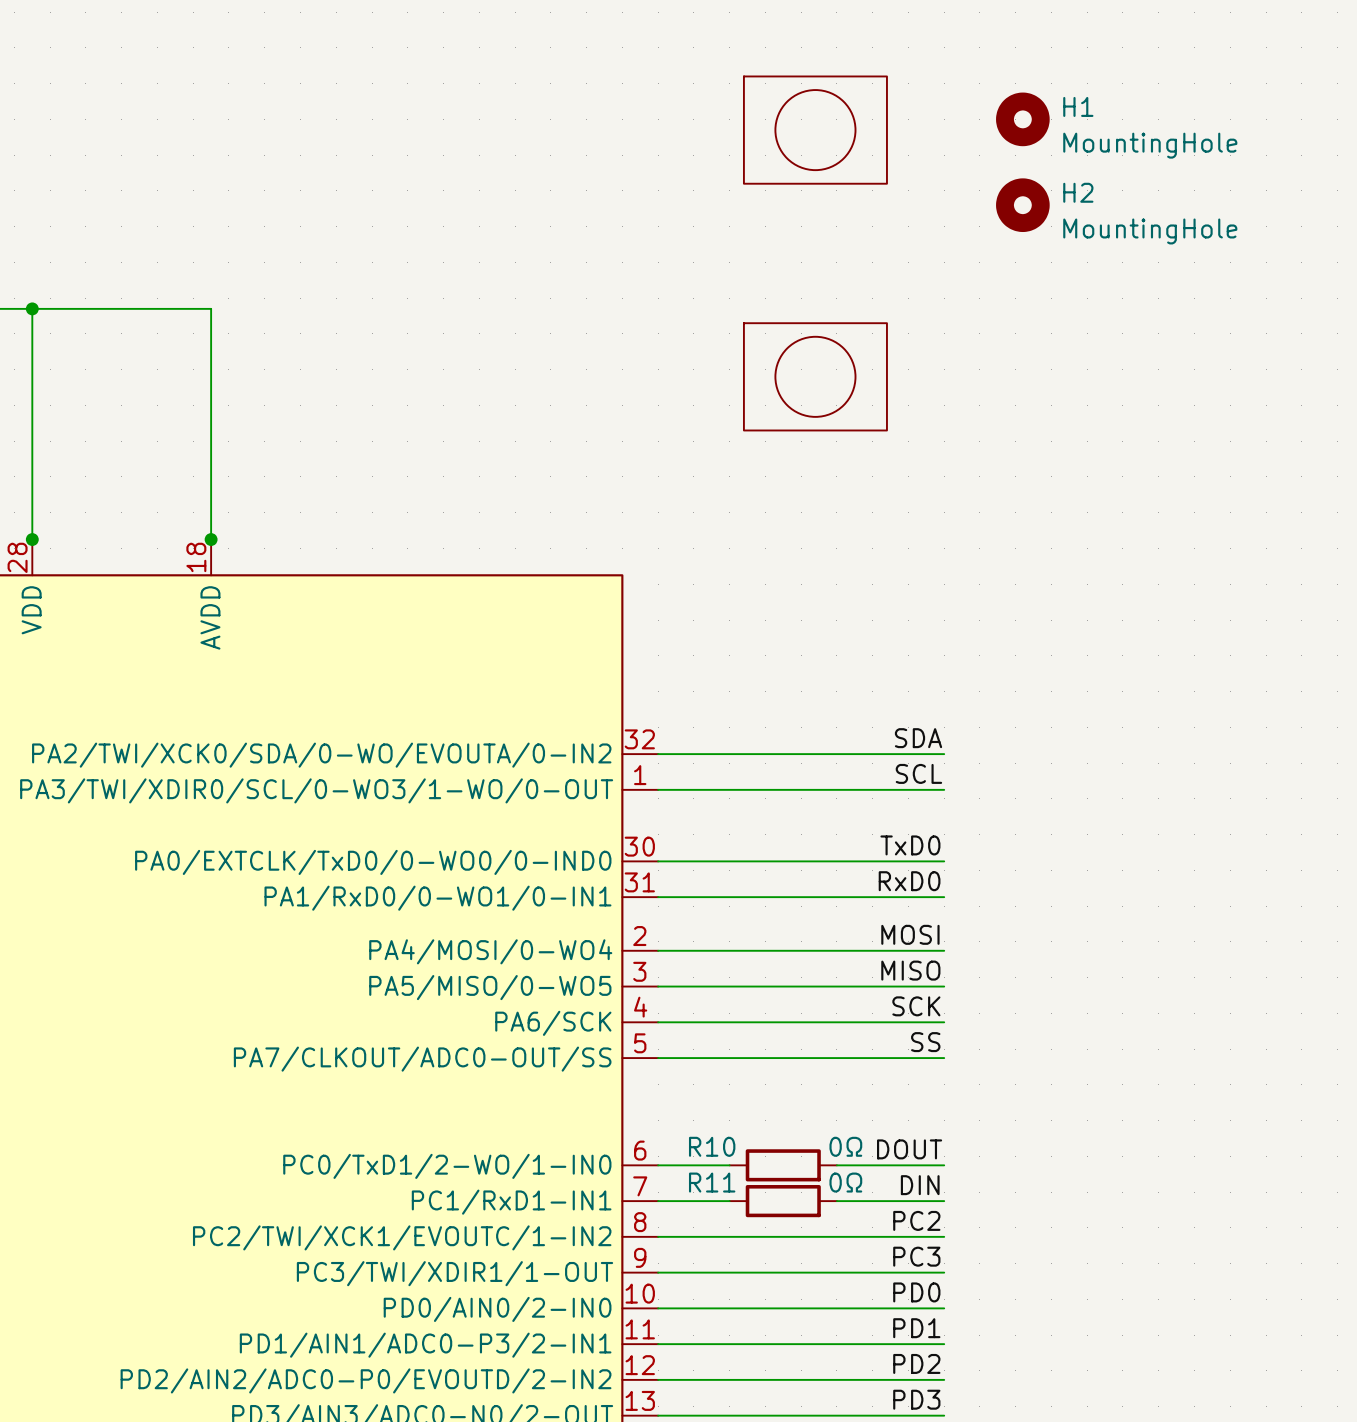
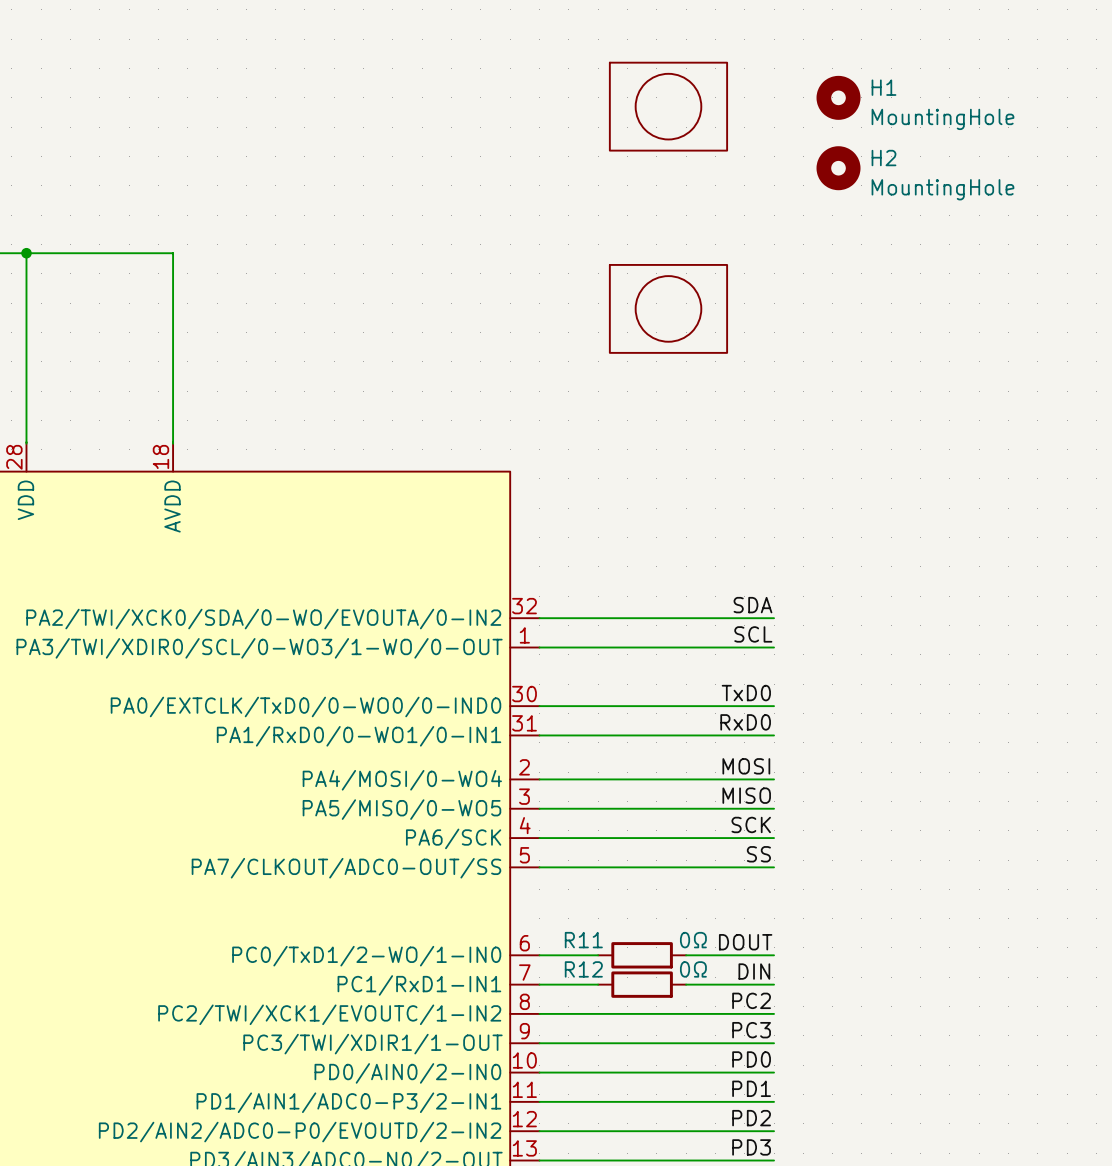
junction: (32, 539) -> none
junction: (211, 539) -> none
R10 name: R10 (712, 1146) -> R11 (583, 940)
R11 name: R11 (712, 1182) -> R12 (583, 969)

